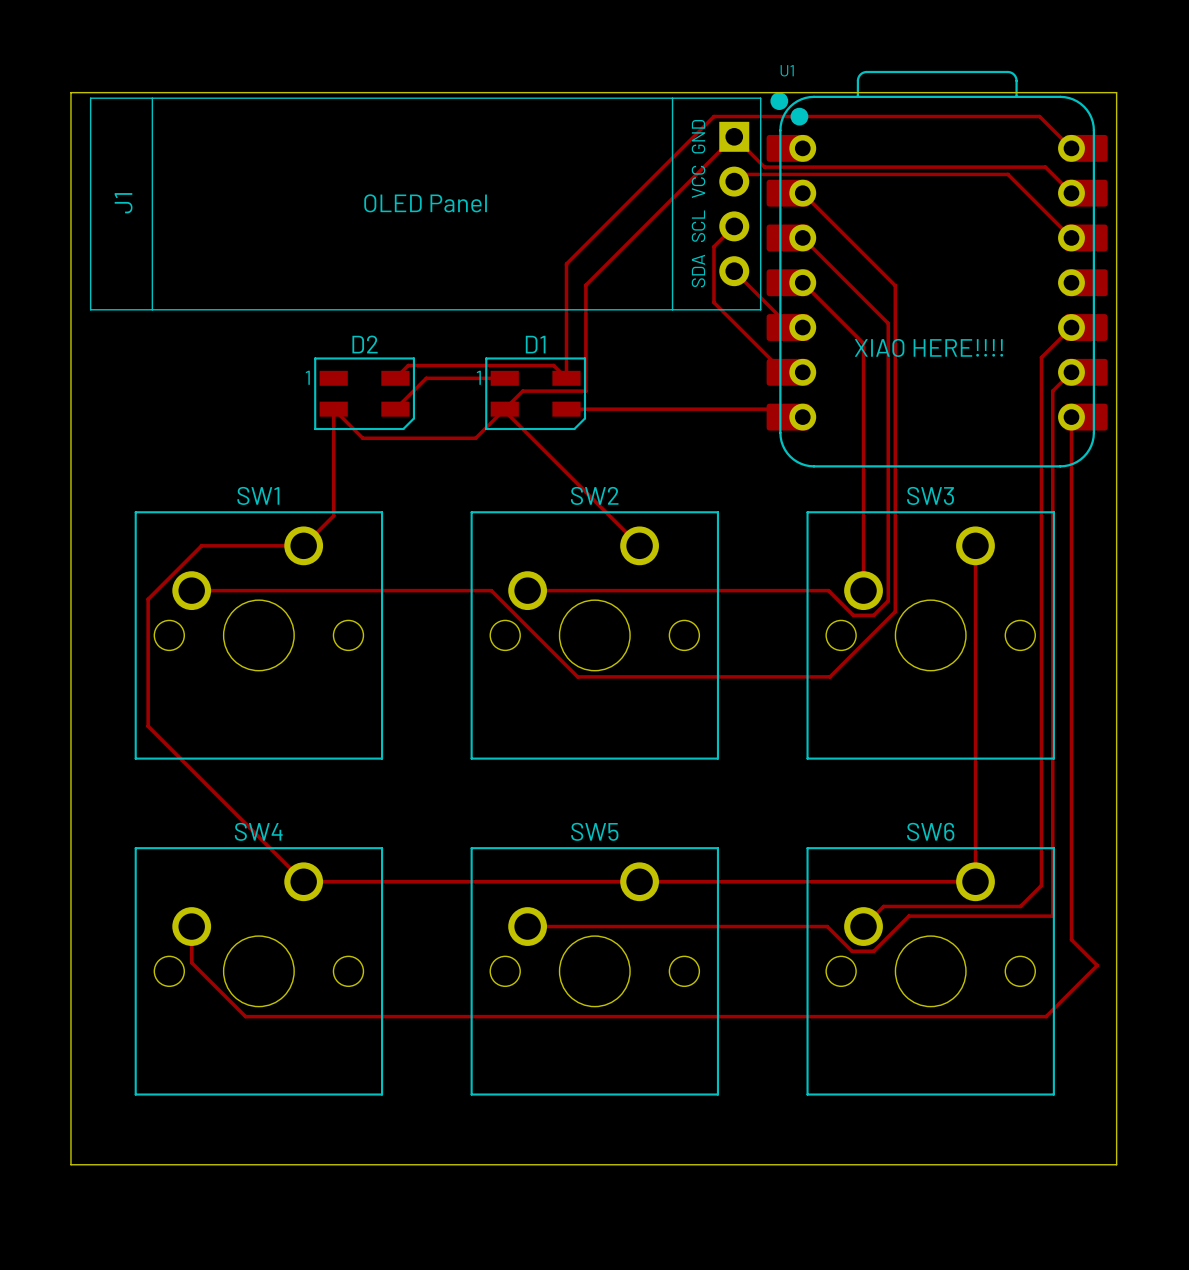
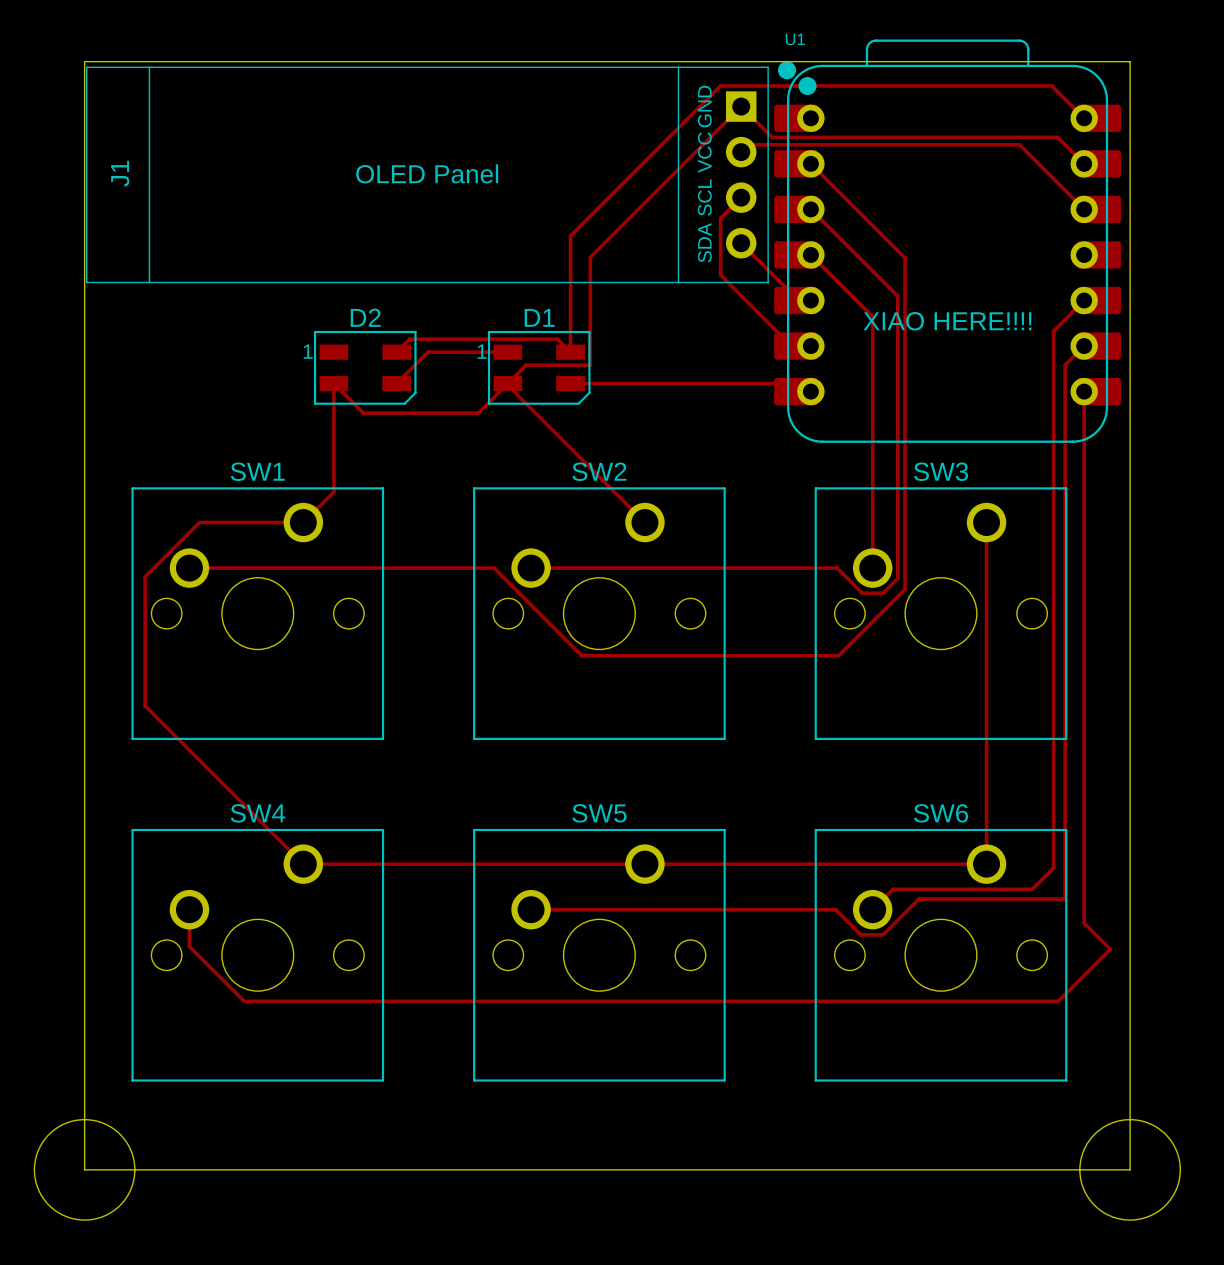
board edge: (88, 92) (70, 92) (70, 1164) (1116, 1164) -> (84, 61) (84, 1169) (1130, 1169) (1130, 1151)
round board edge: none -> [33, 1119, 136, 1221]
round board edge: none -> [1079, 1119, 1181, 1221]

